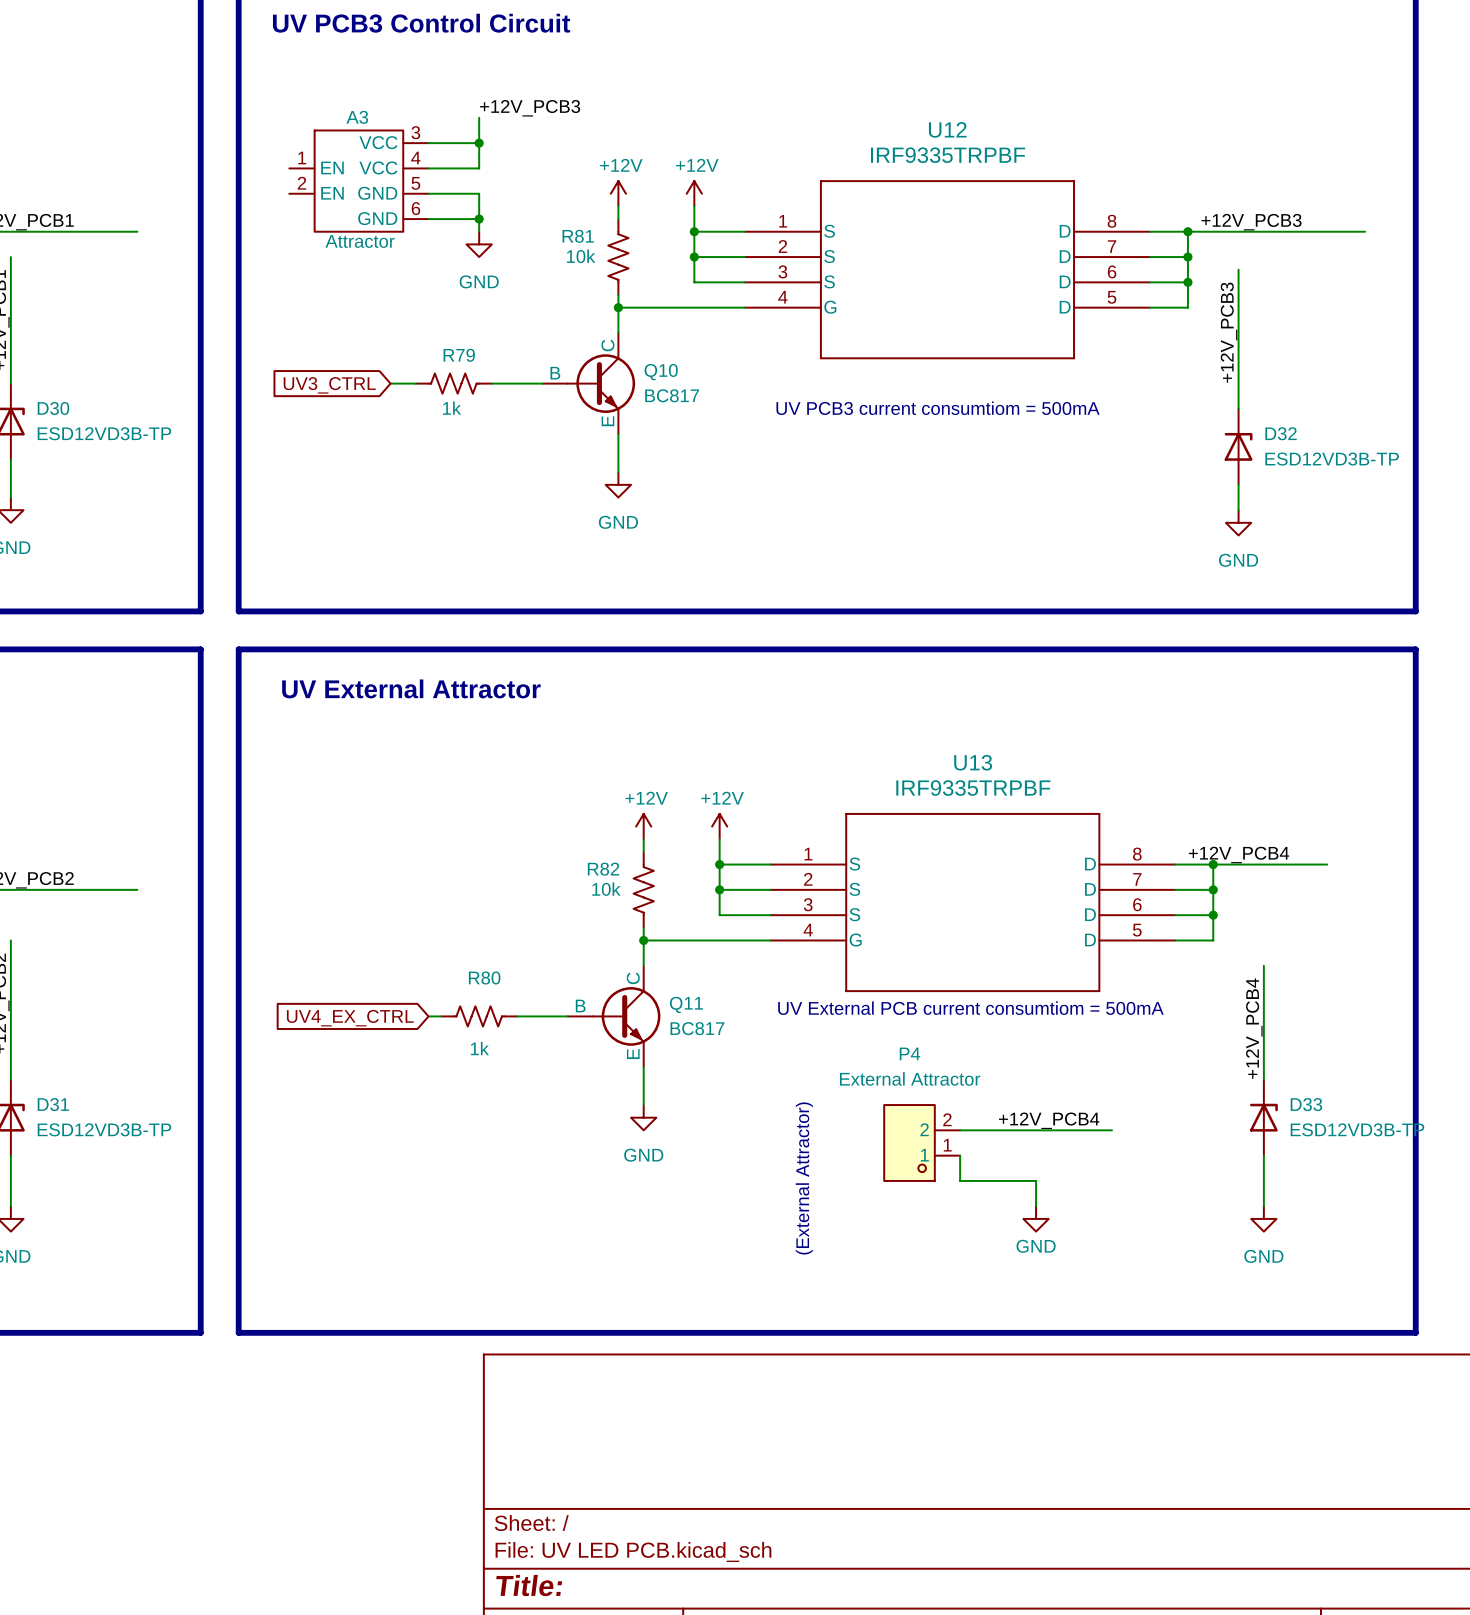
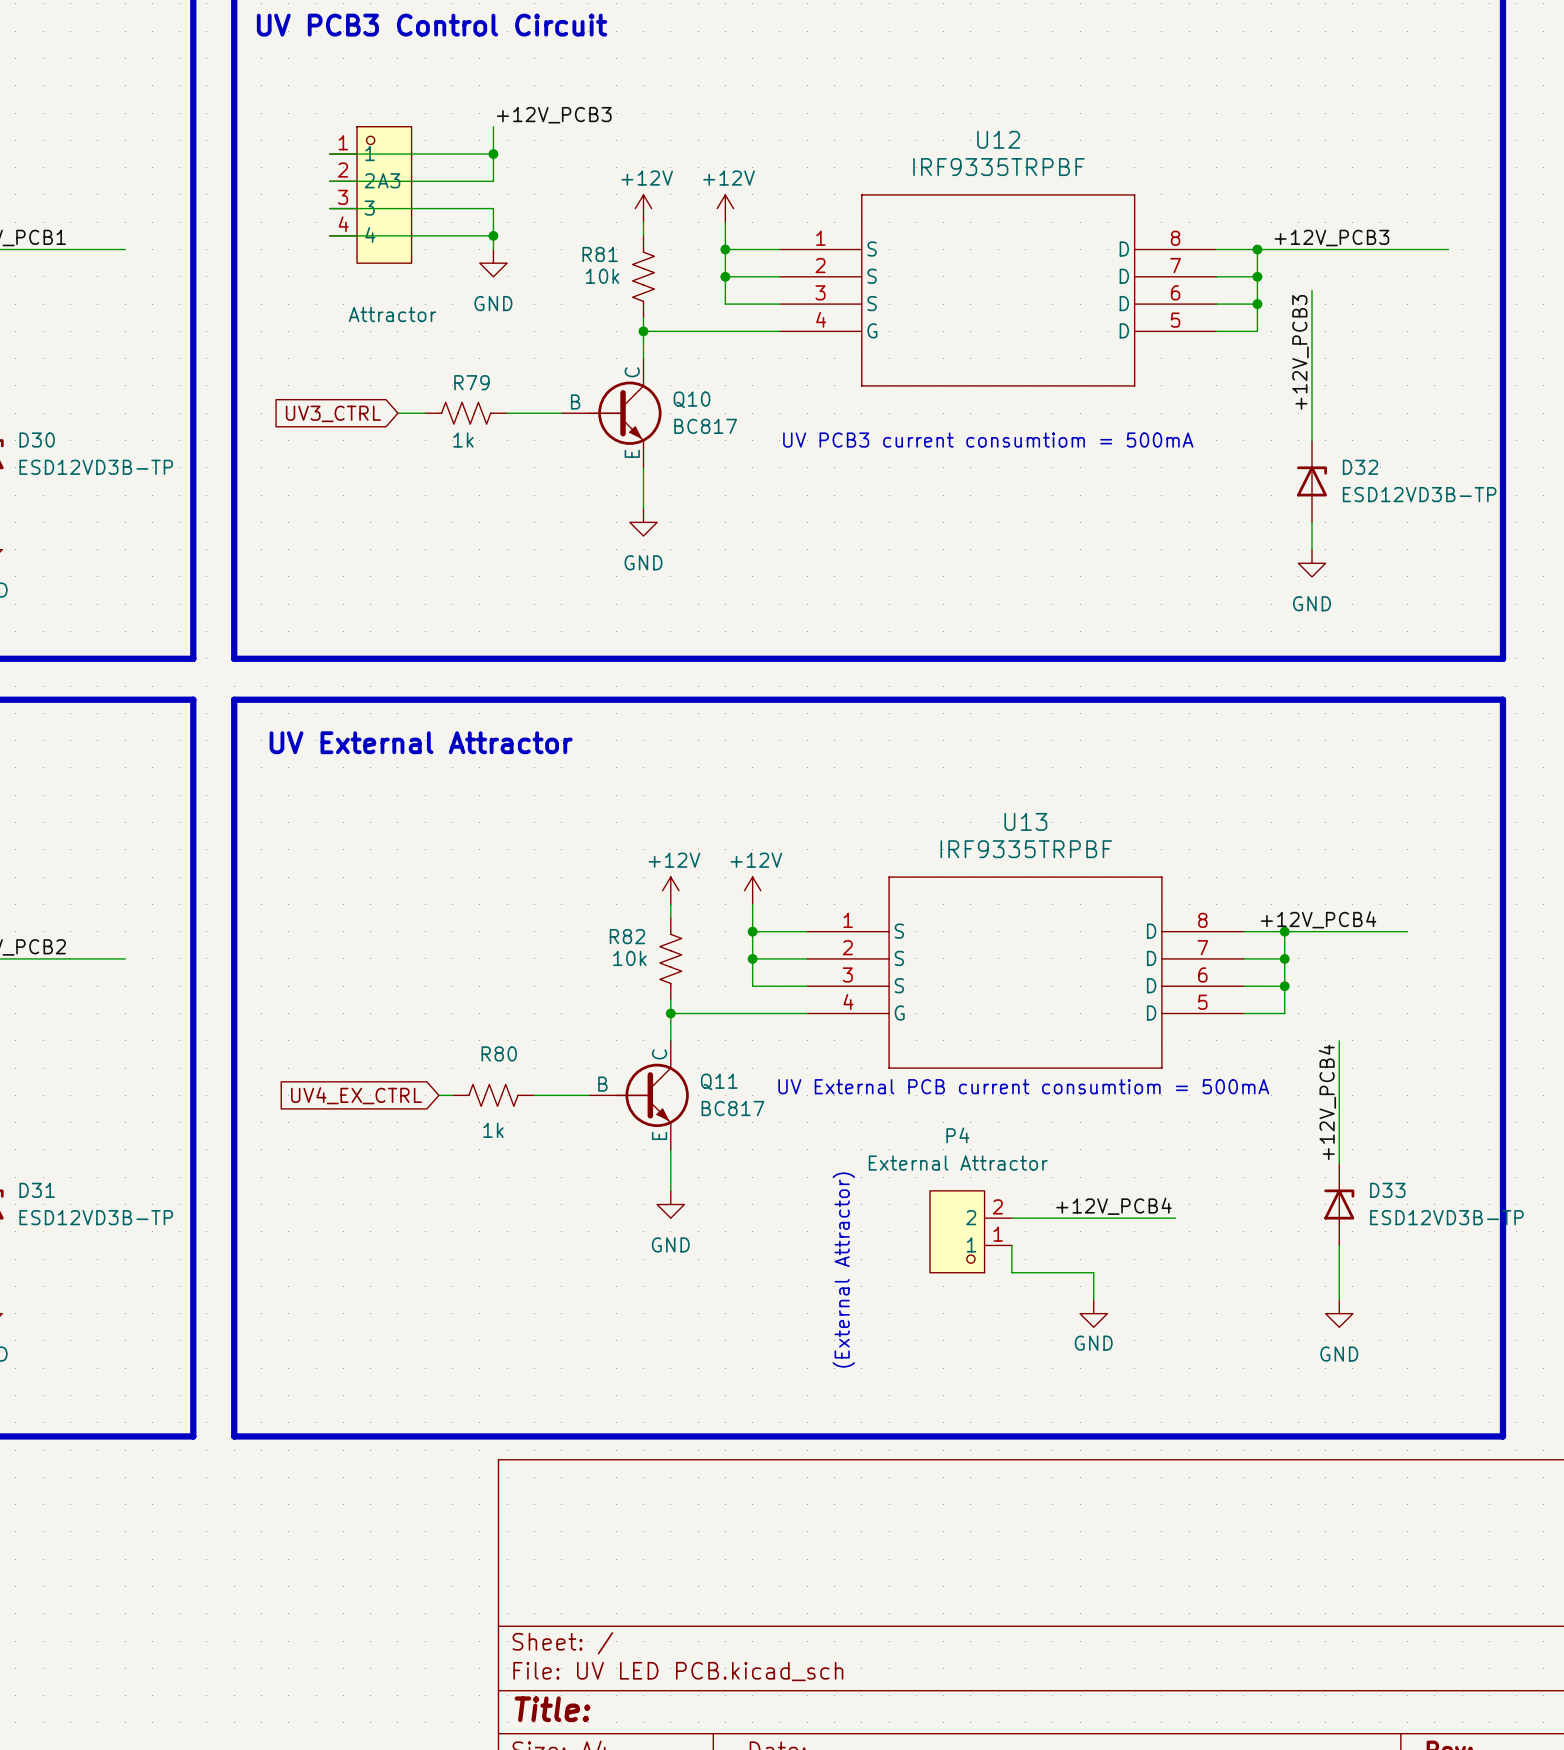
A3 name position: A3 (357, 117) -> A3 (389, 180)
A3 symbol: [289, 130, 429, 232] -> [329, 126, 412, 264]
wire: none -> (329, 154) (438, 154)
wire: none -> (329, 181) (438, 181)
wire: none -> (329, 208) (438, 208)
wire: none -> (329, 235) (438, 235)
A3 value position: Attractor (360, 241) -> Attractor (392, 314)

